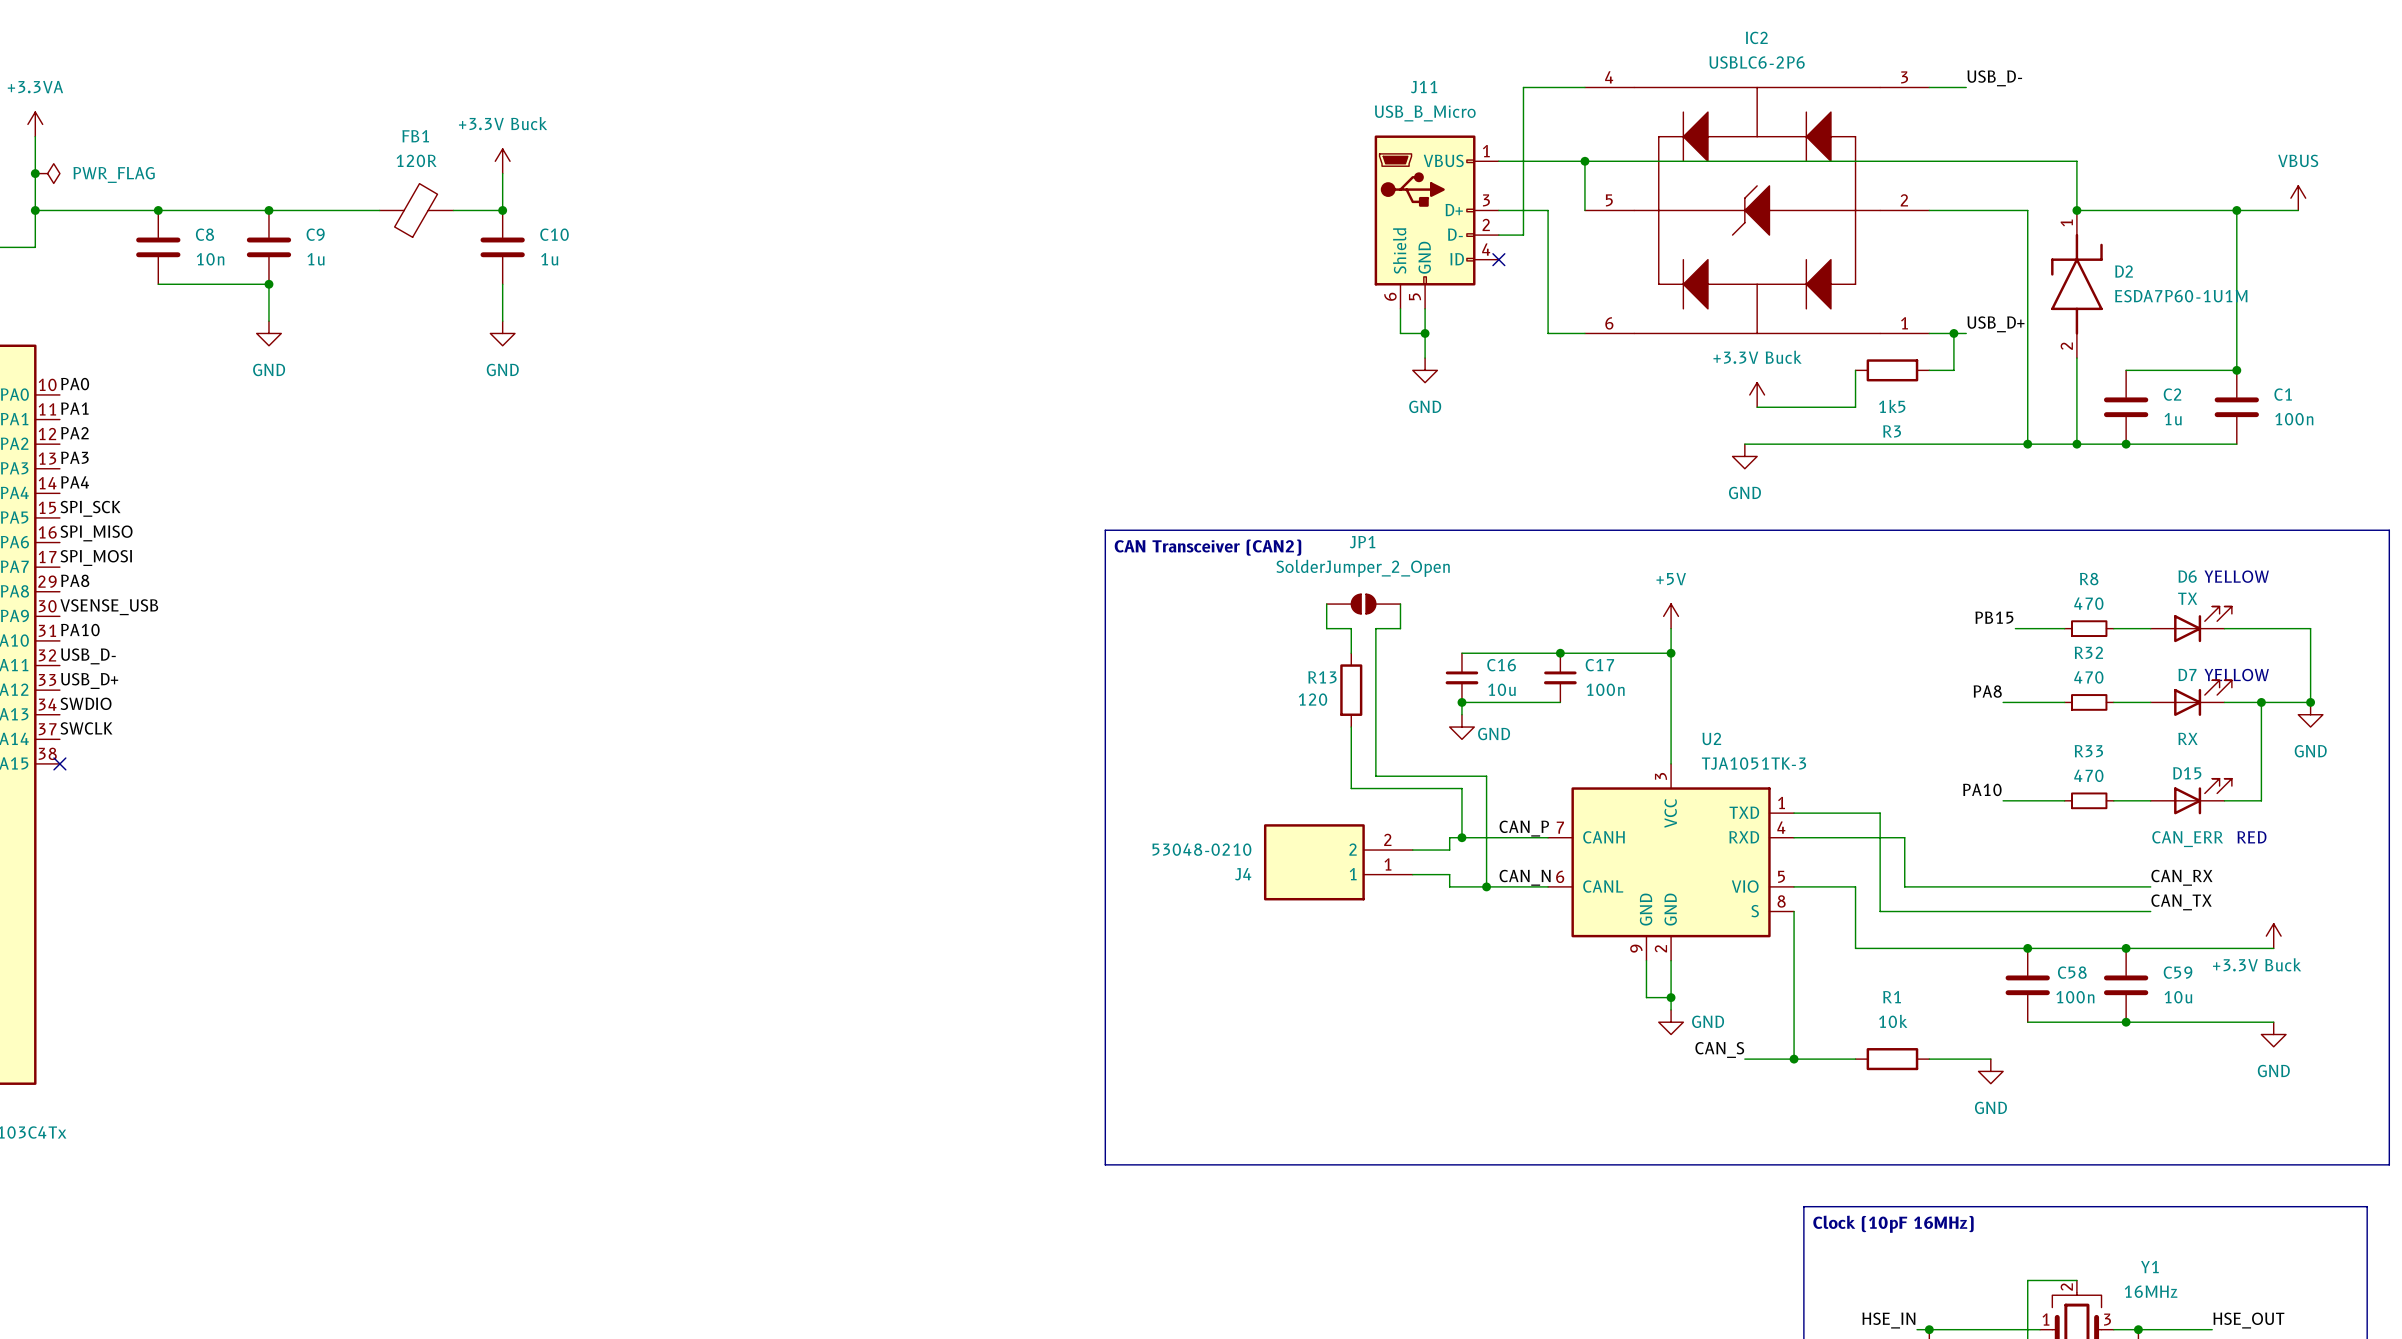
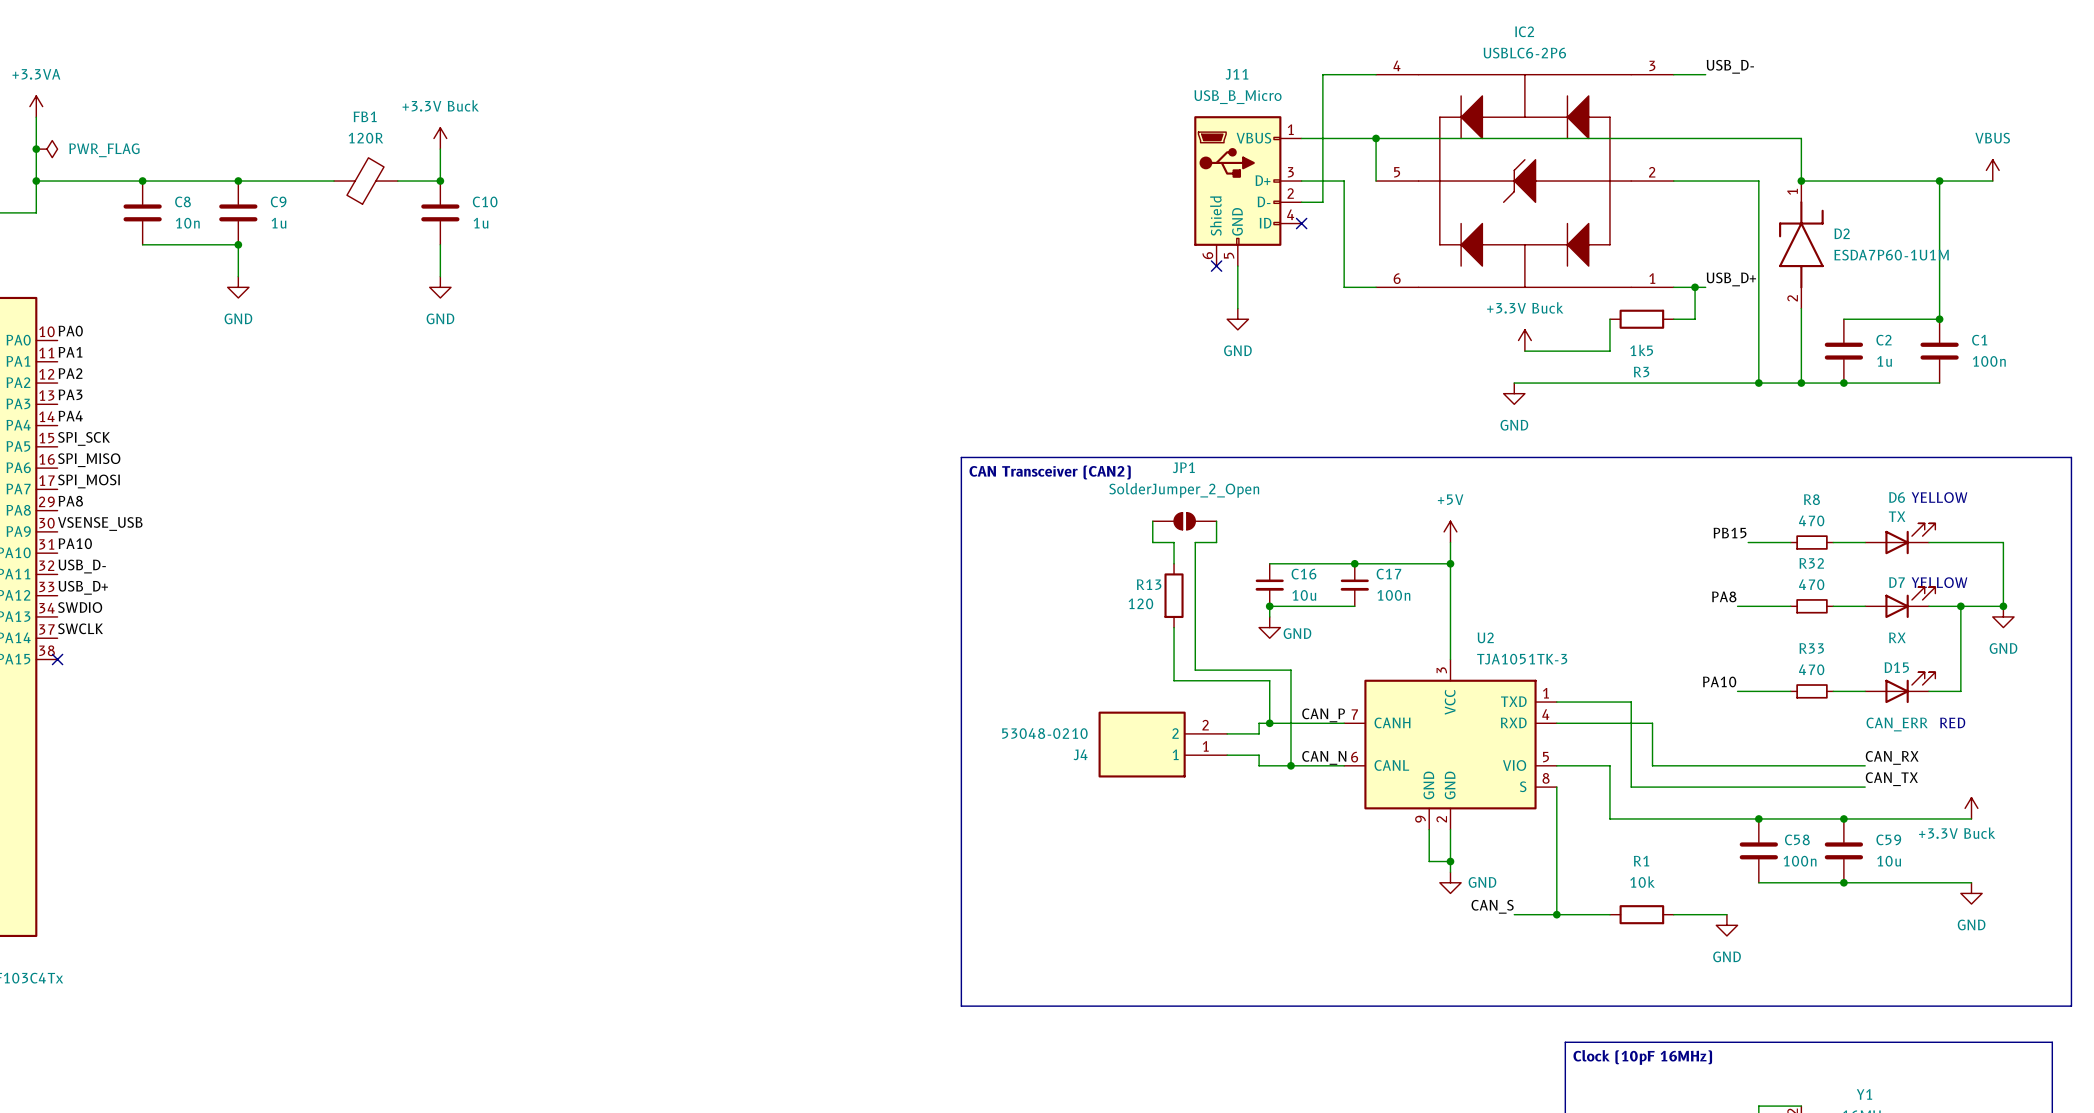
wire: (1400, 308) (1400, 333) (1425, 333) -> none
no-connect mark: none -> (1216, 266)
junction: (1425, 333) -> none

